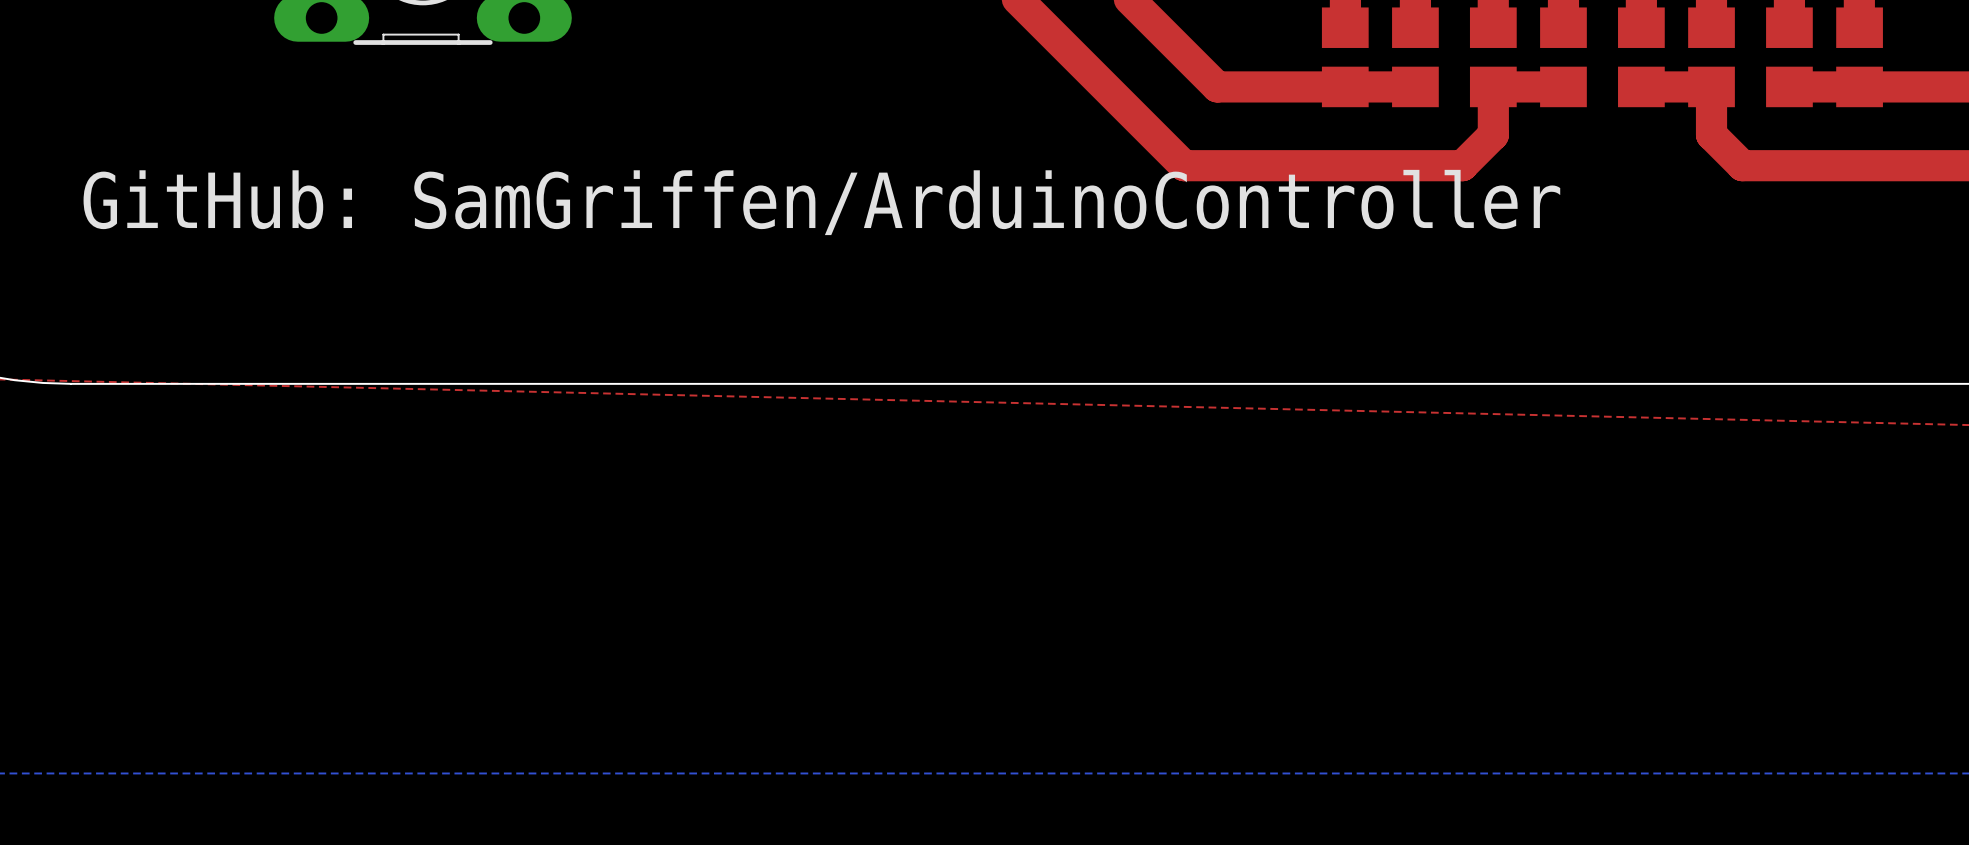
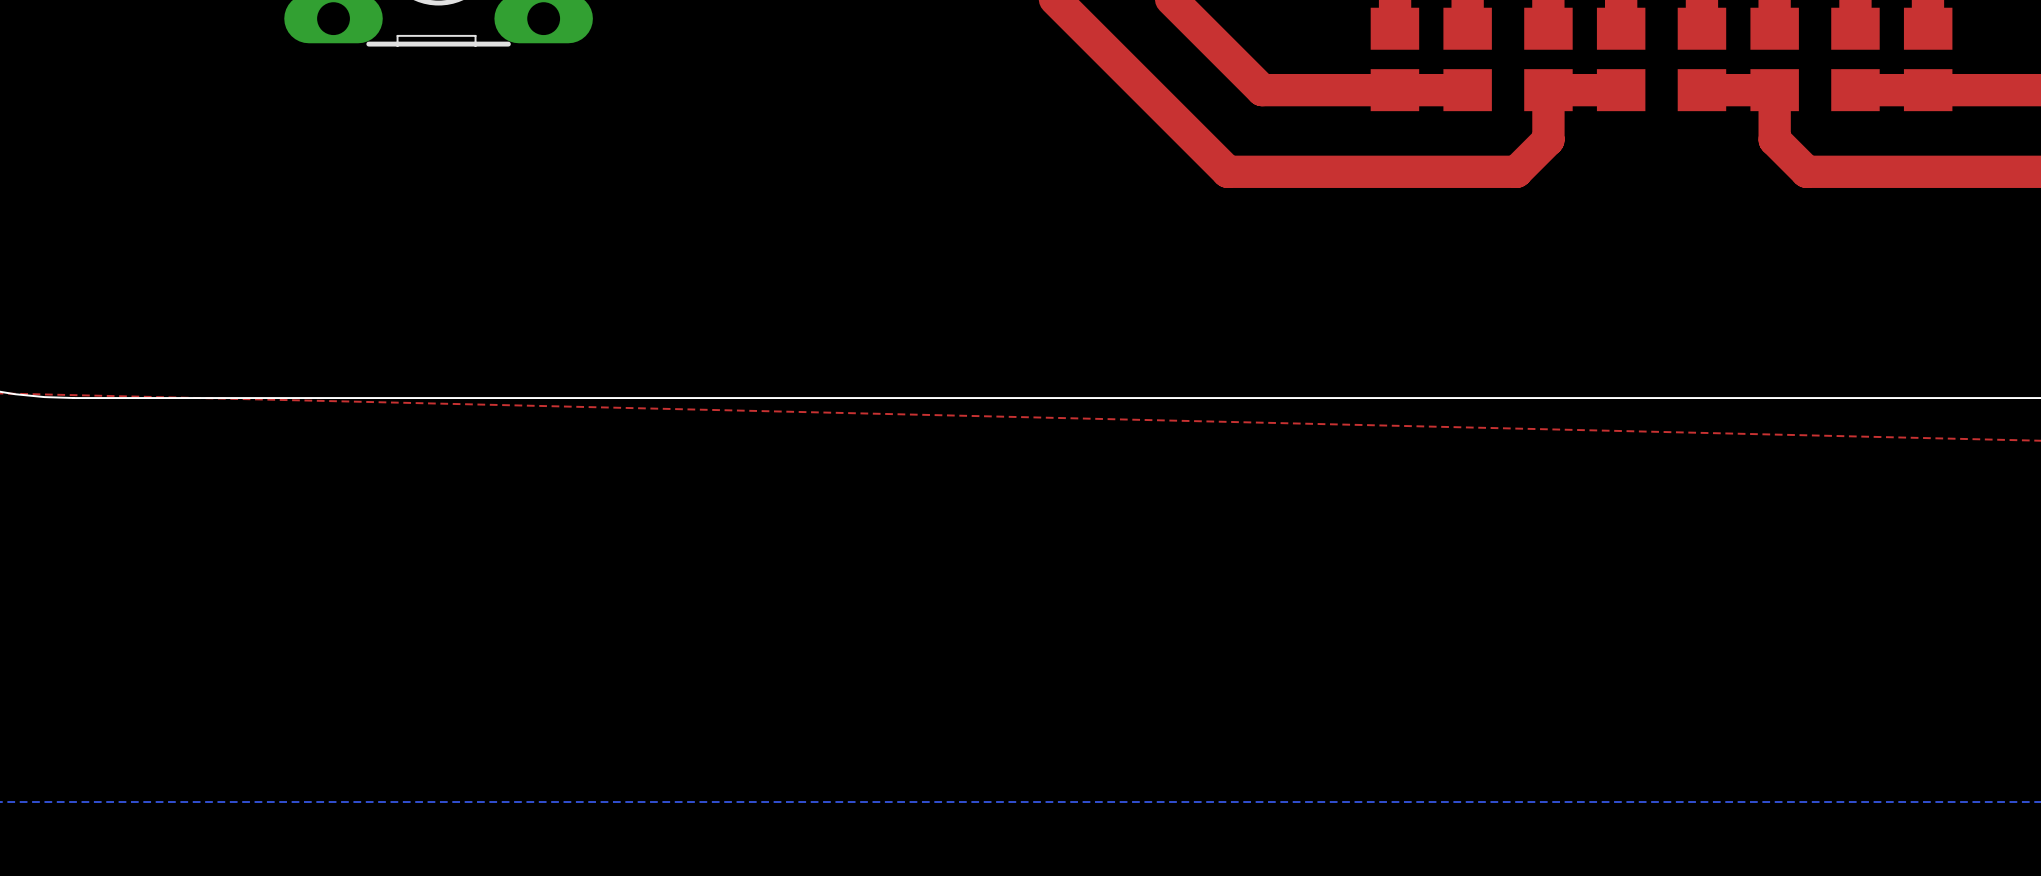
text: GitHub: SamGriffen/ArduinoController (821, 202) -> none

